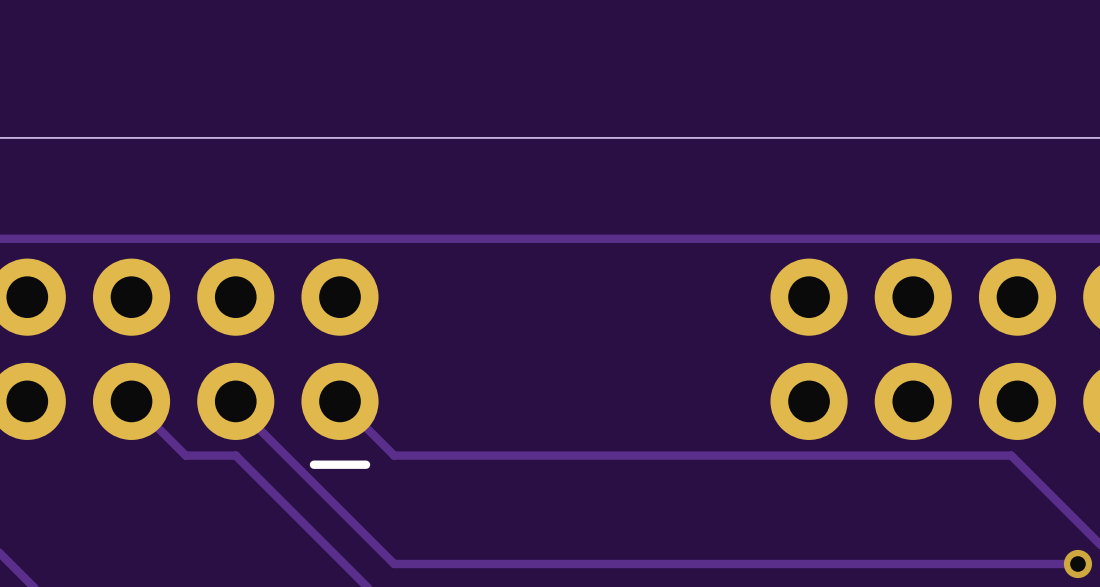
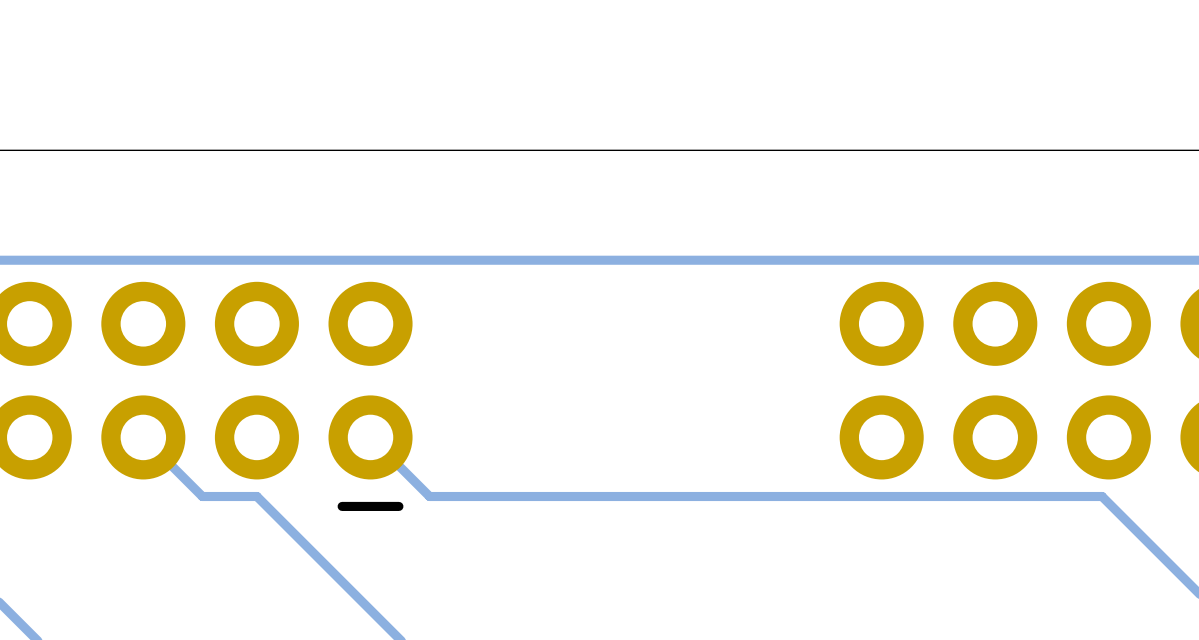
track: (235, 401) (235, 405) (394, 564) (1077, 564) -> none
via: (1077, 564) -> none

